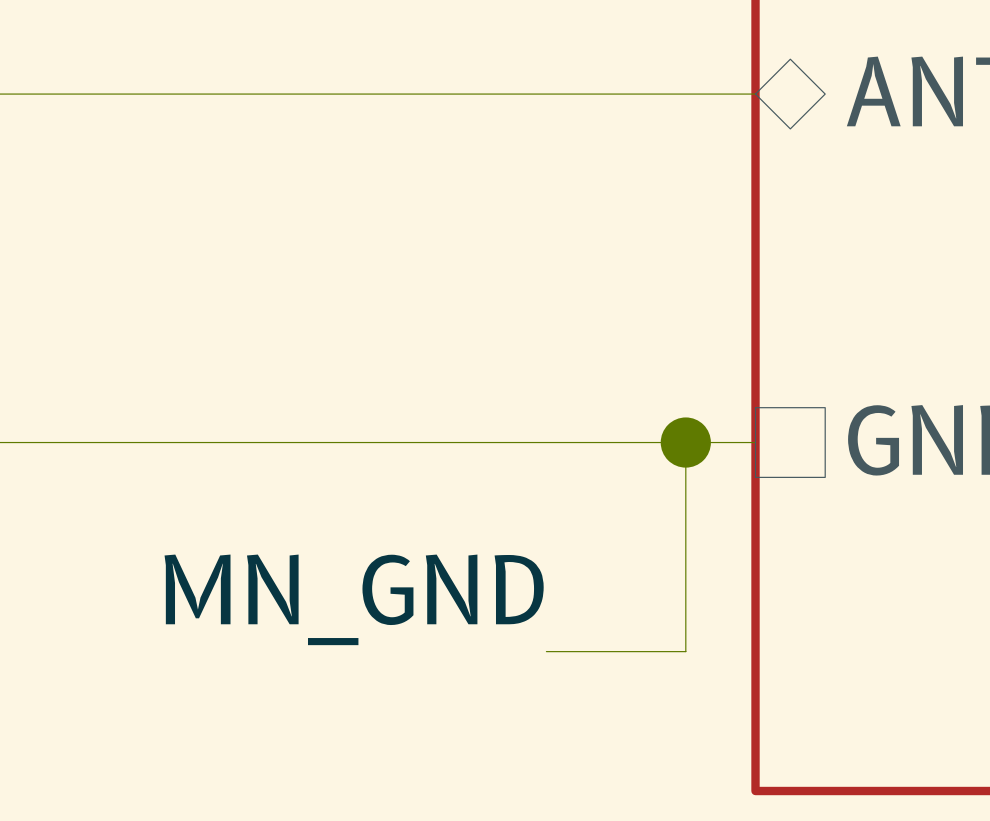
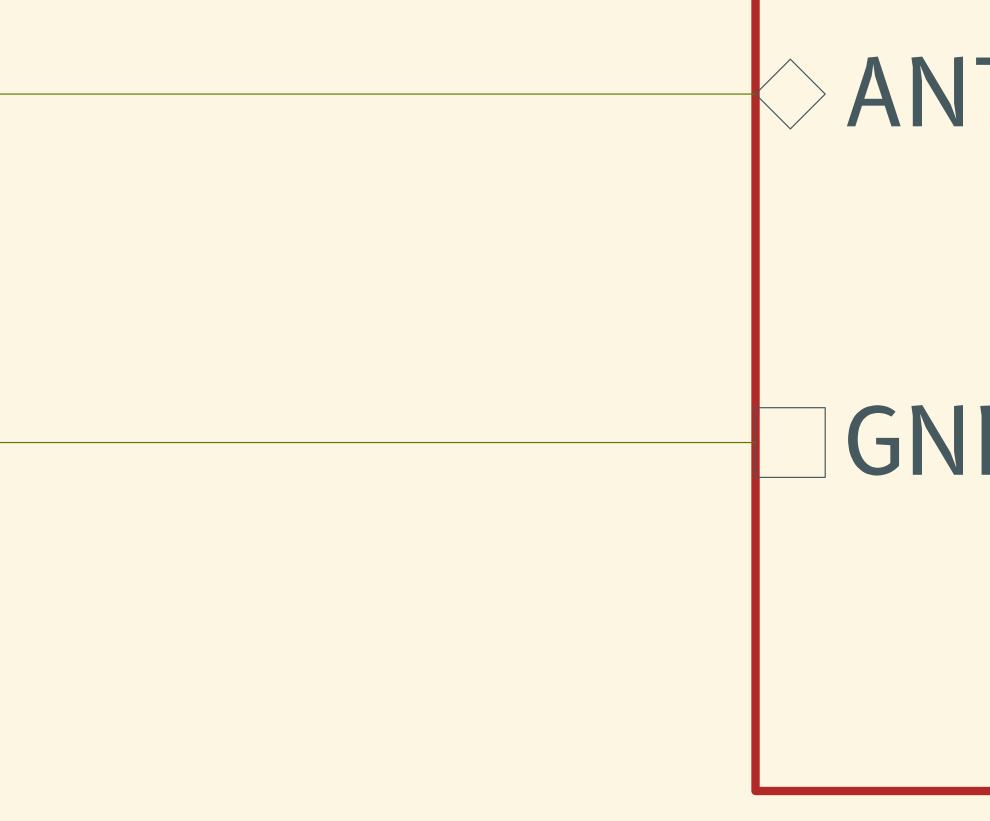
wire: (685, 442) (685, 651) (546, 651) -> none
junction: (685, 442) -> none
label: MN_GND (354, 599) -> none

